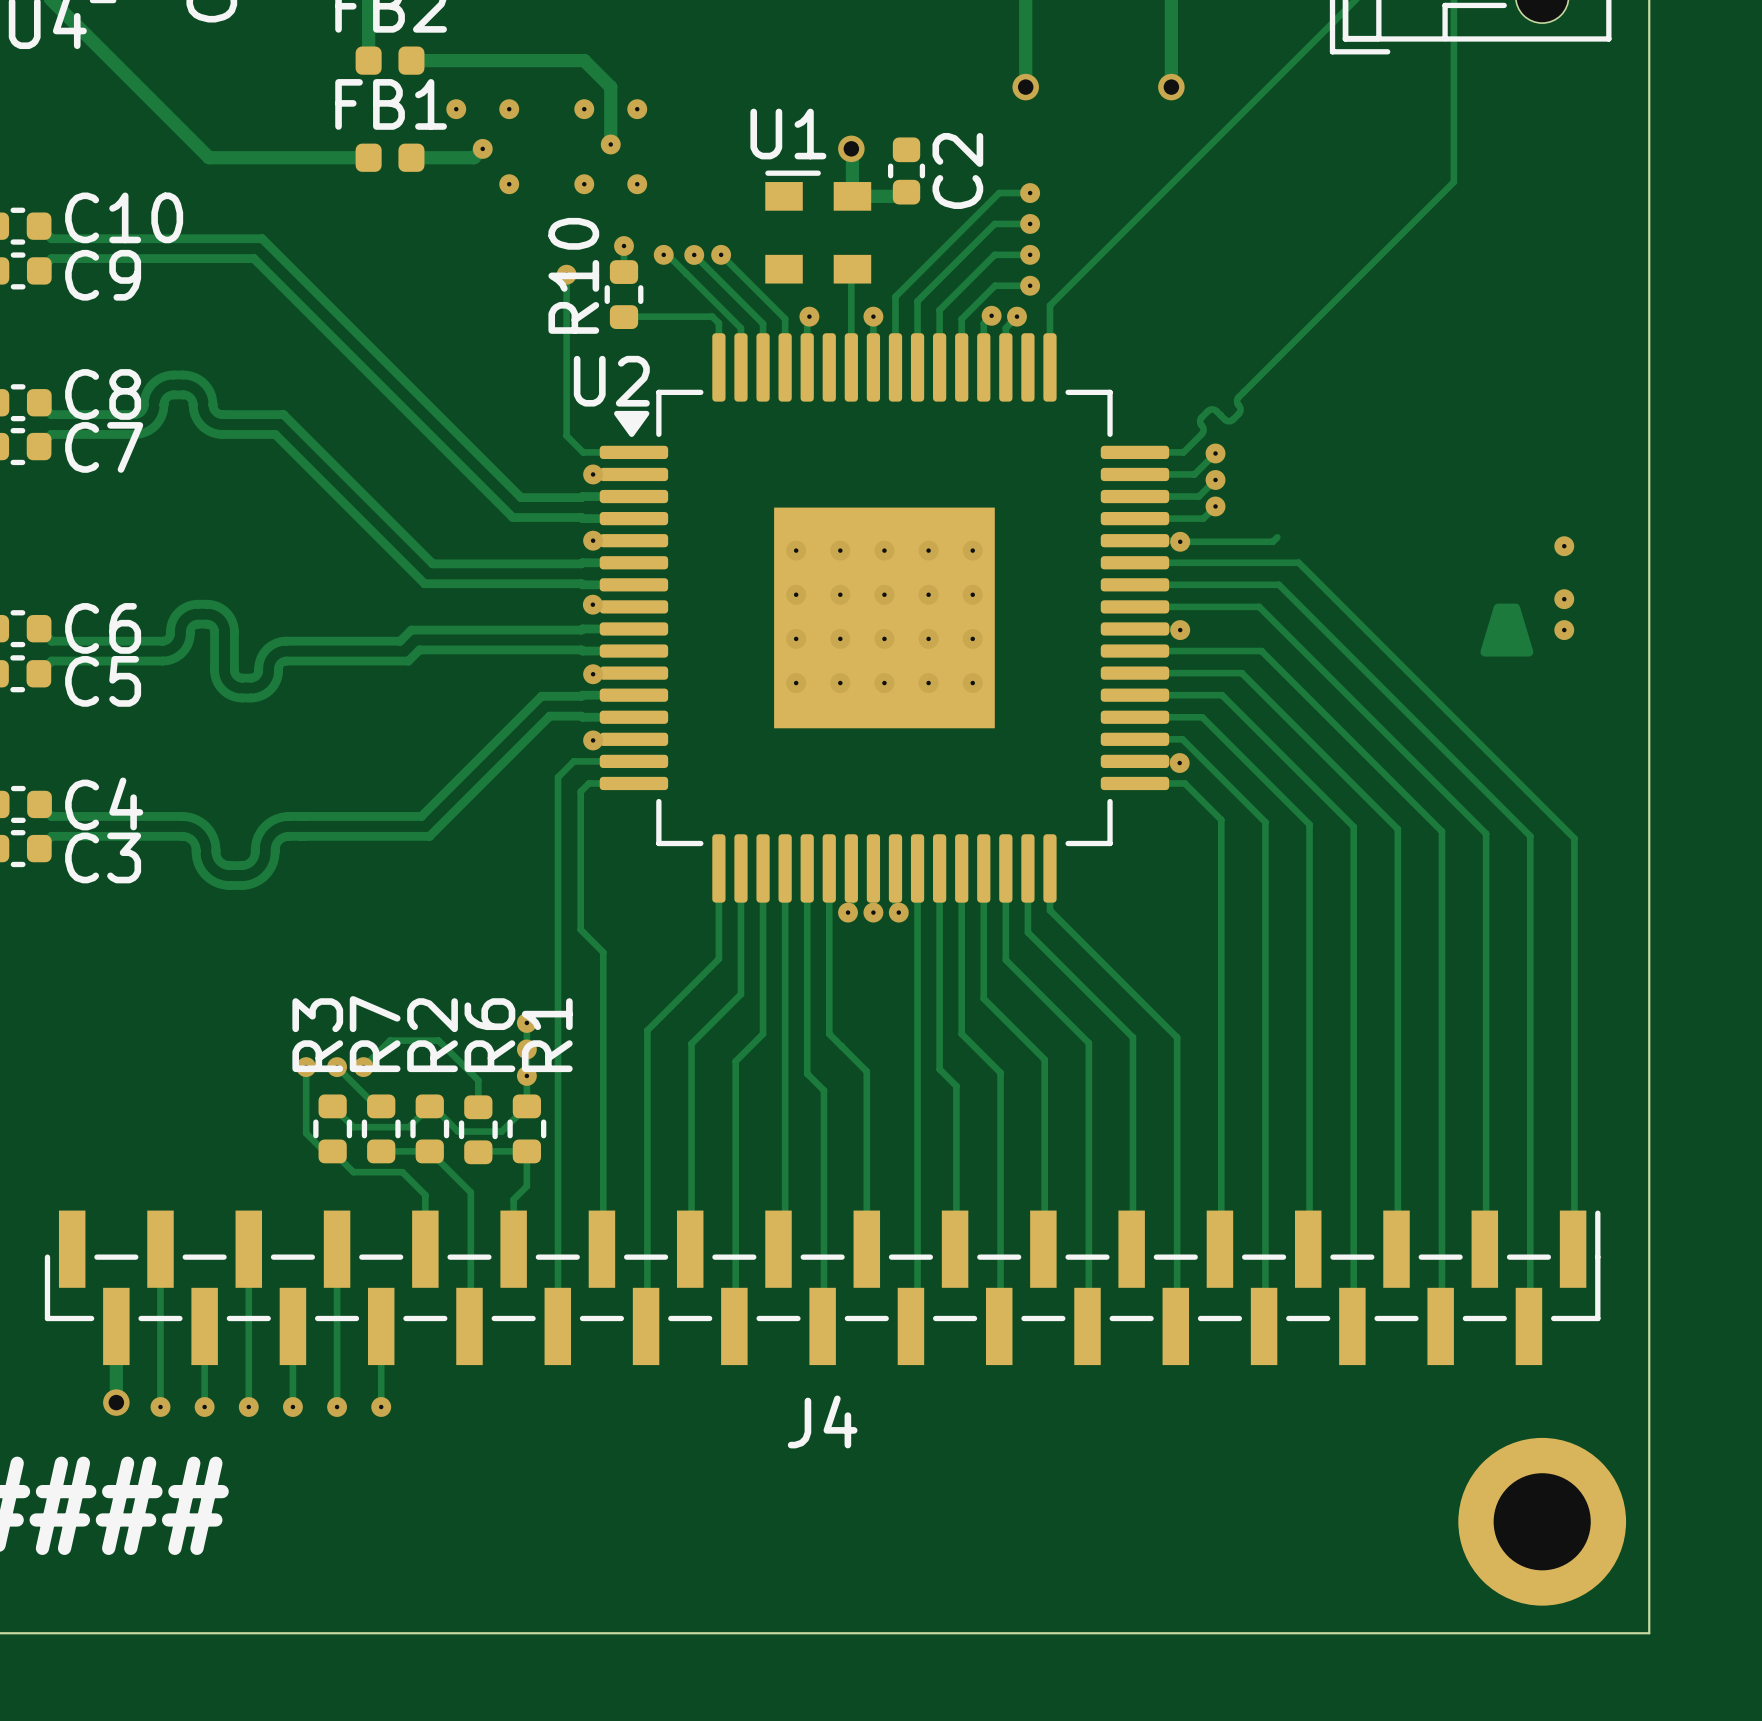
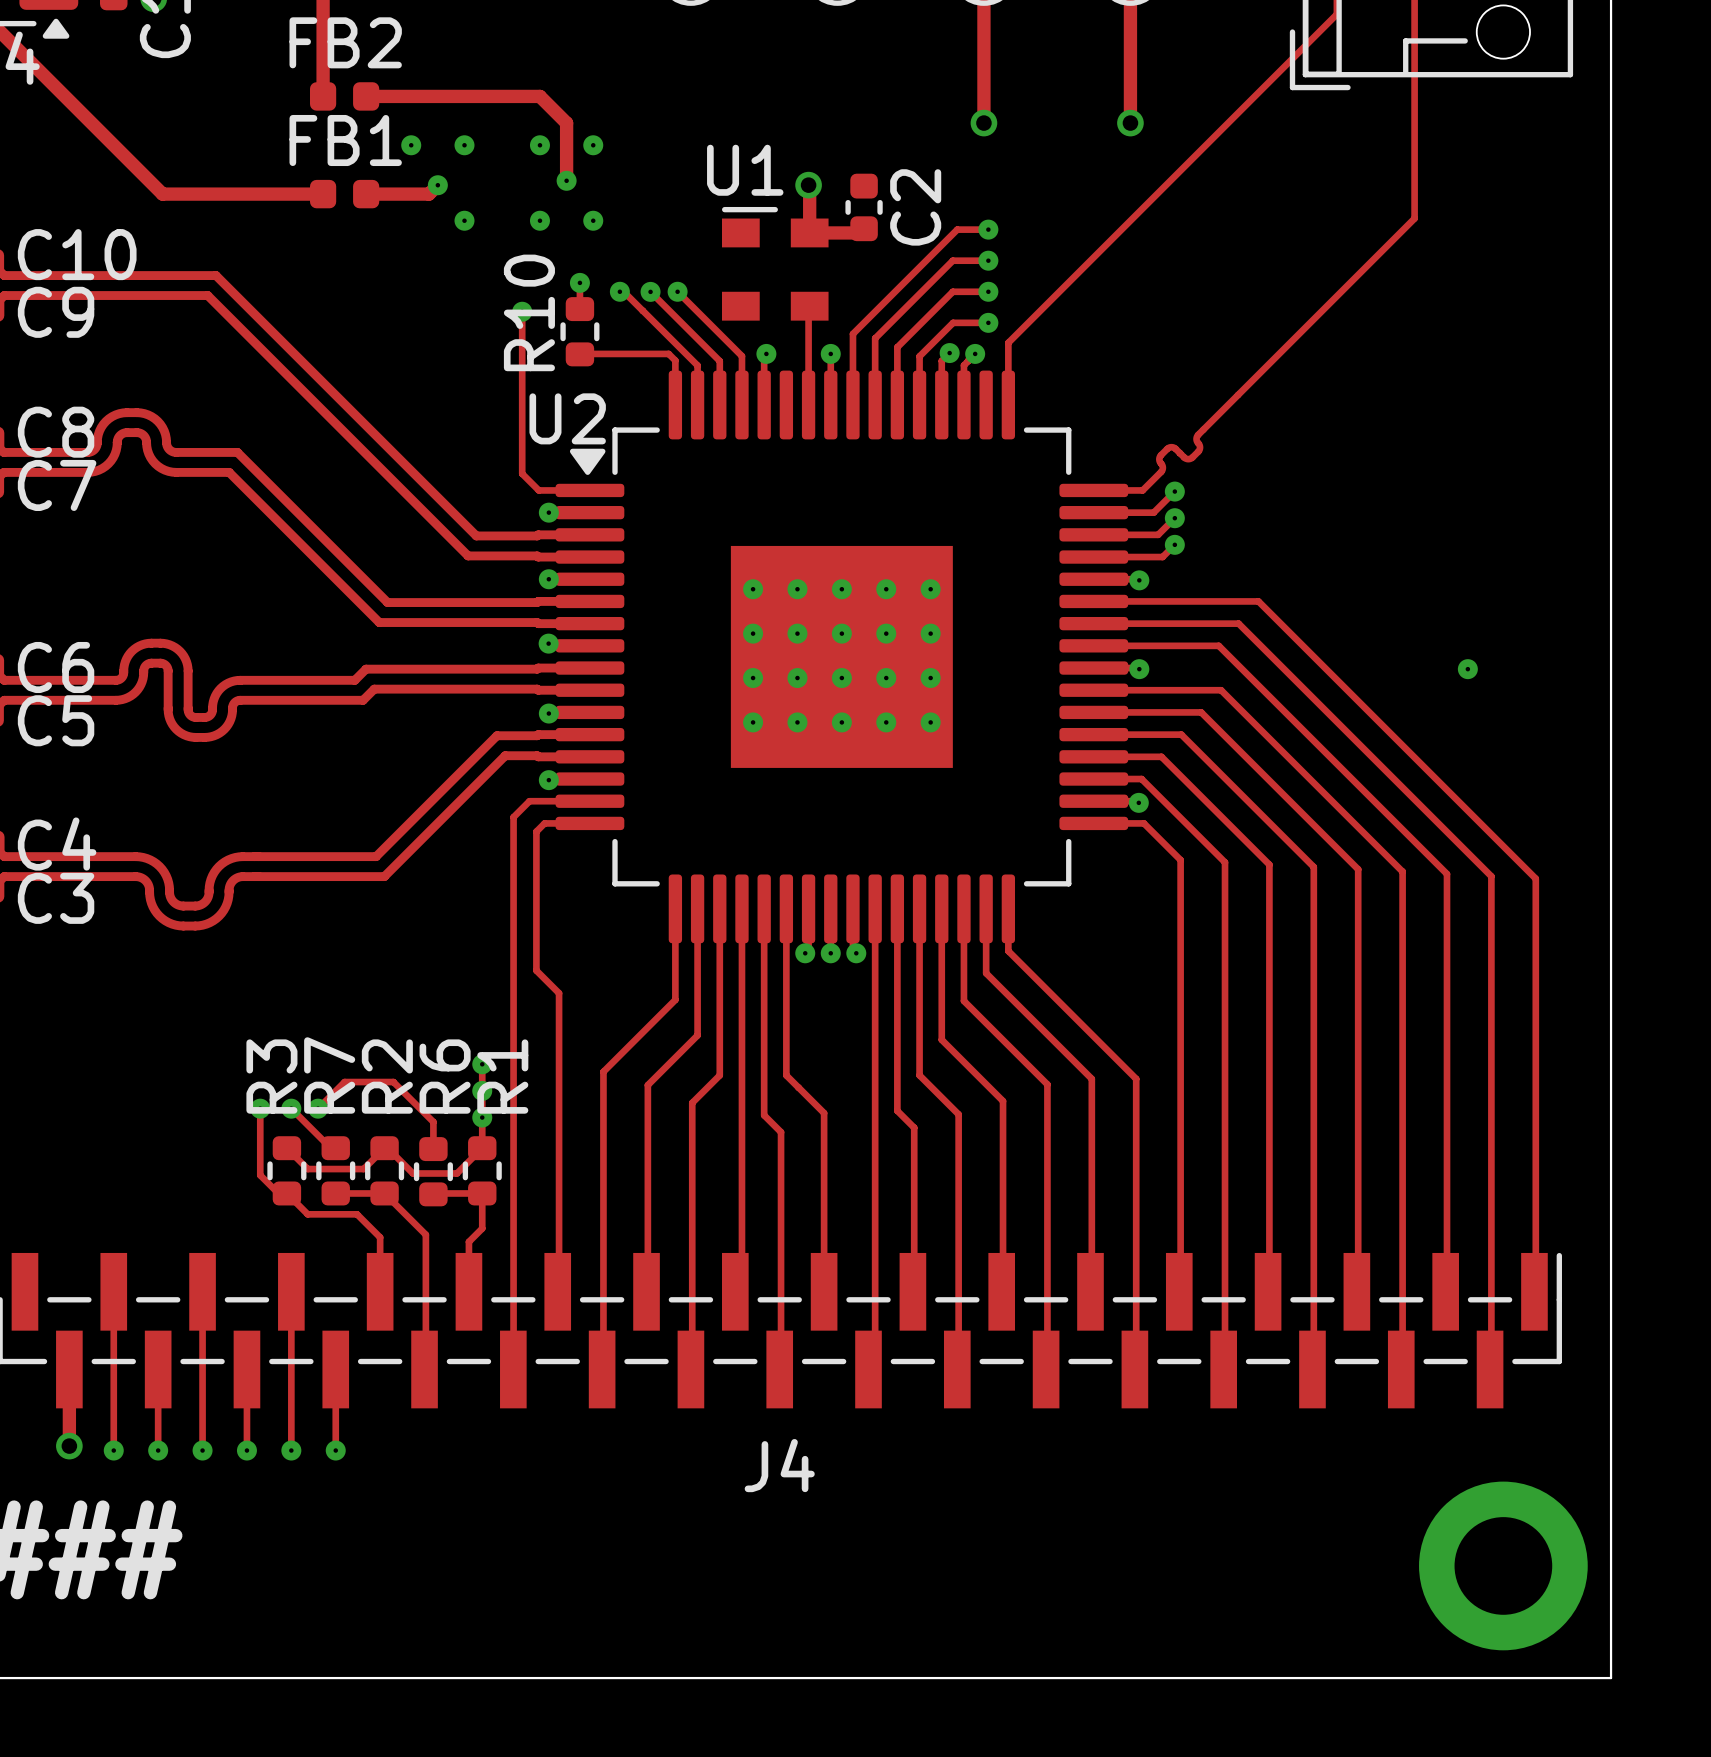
track: (1277, 537) (1272, 541) (1180, 541) -> none
via: (1564, 546) -> none
via: (1564, 599) -> none
drawing: [1480, 603, 1534, 657] -> none
via: none -> (1467, 669)
via: (1564, 630) -> none

